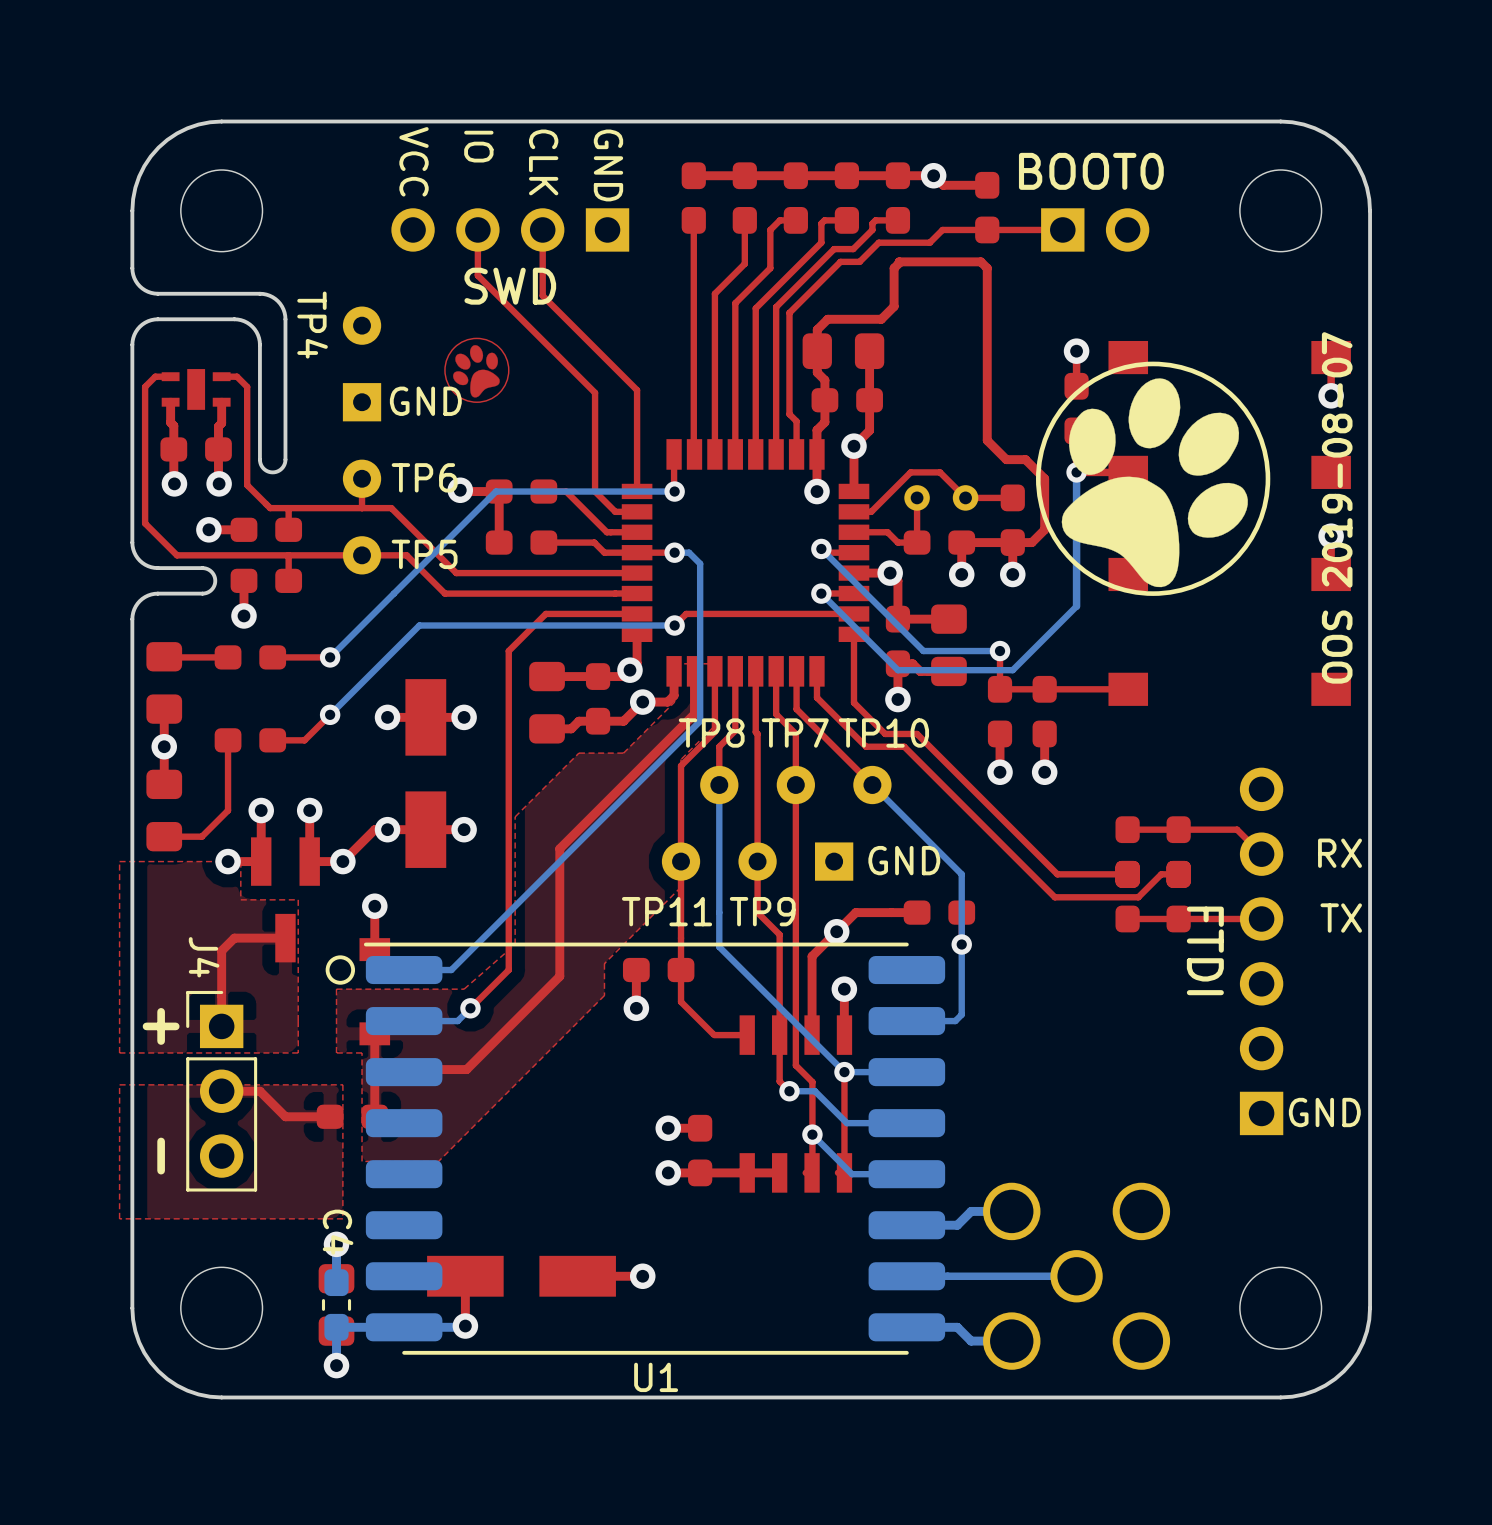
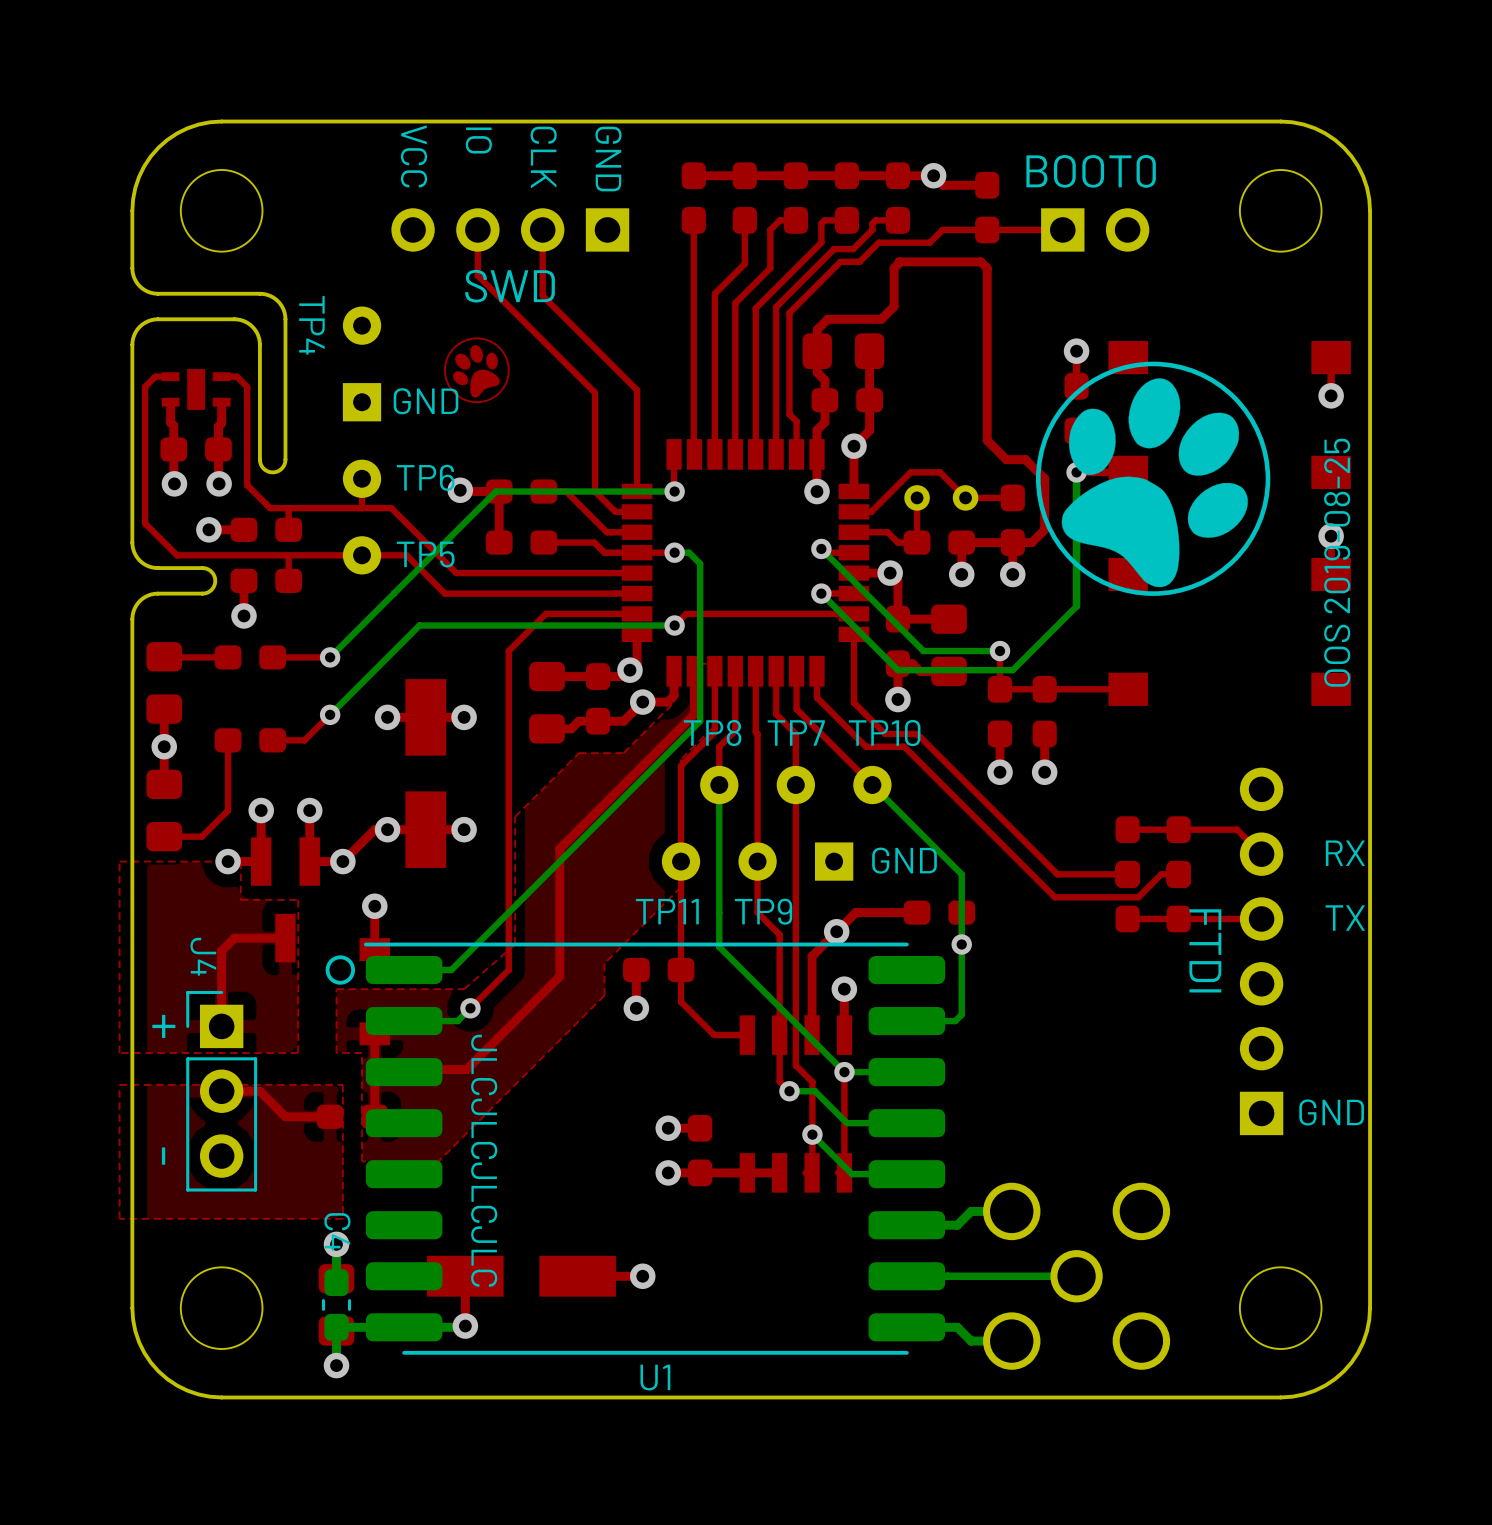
text: OOS 2019-08-07 (1337, 507) -> OOS 2019-08-25 (1337, 562)
text: none -> JLCJLCJLCJLC (484, 1160)

